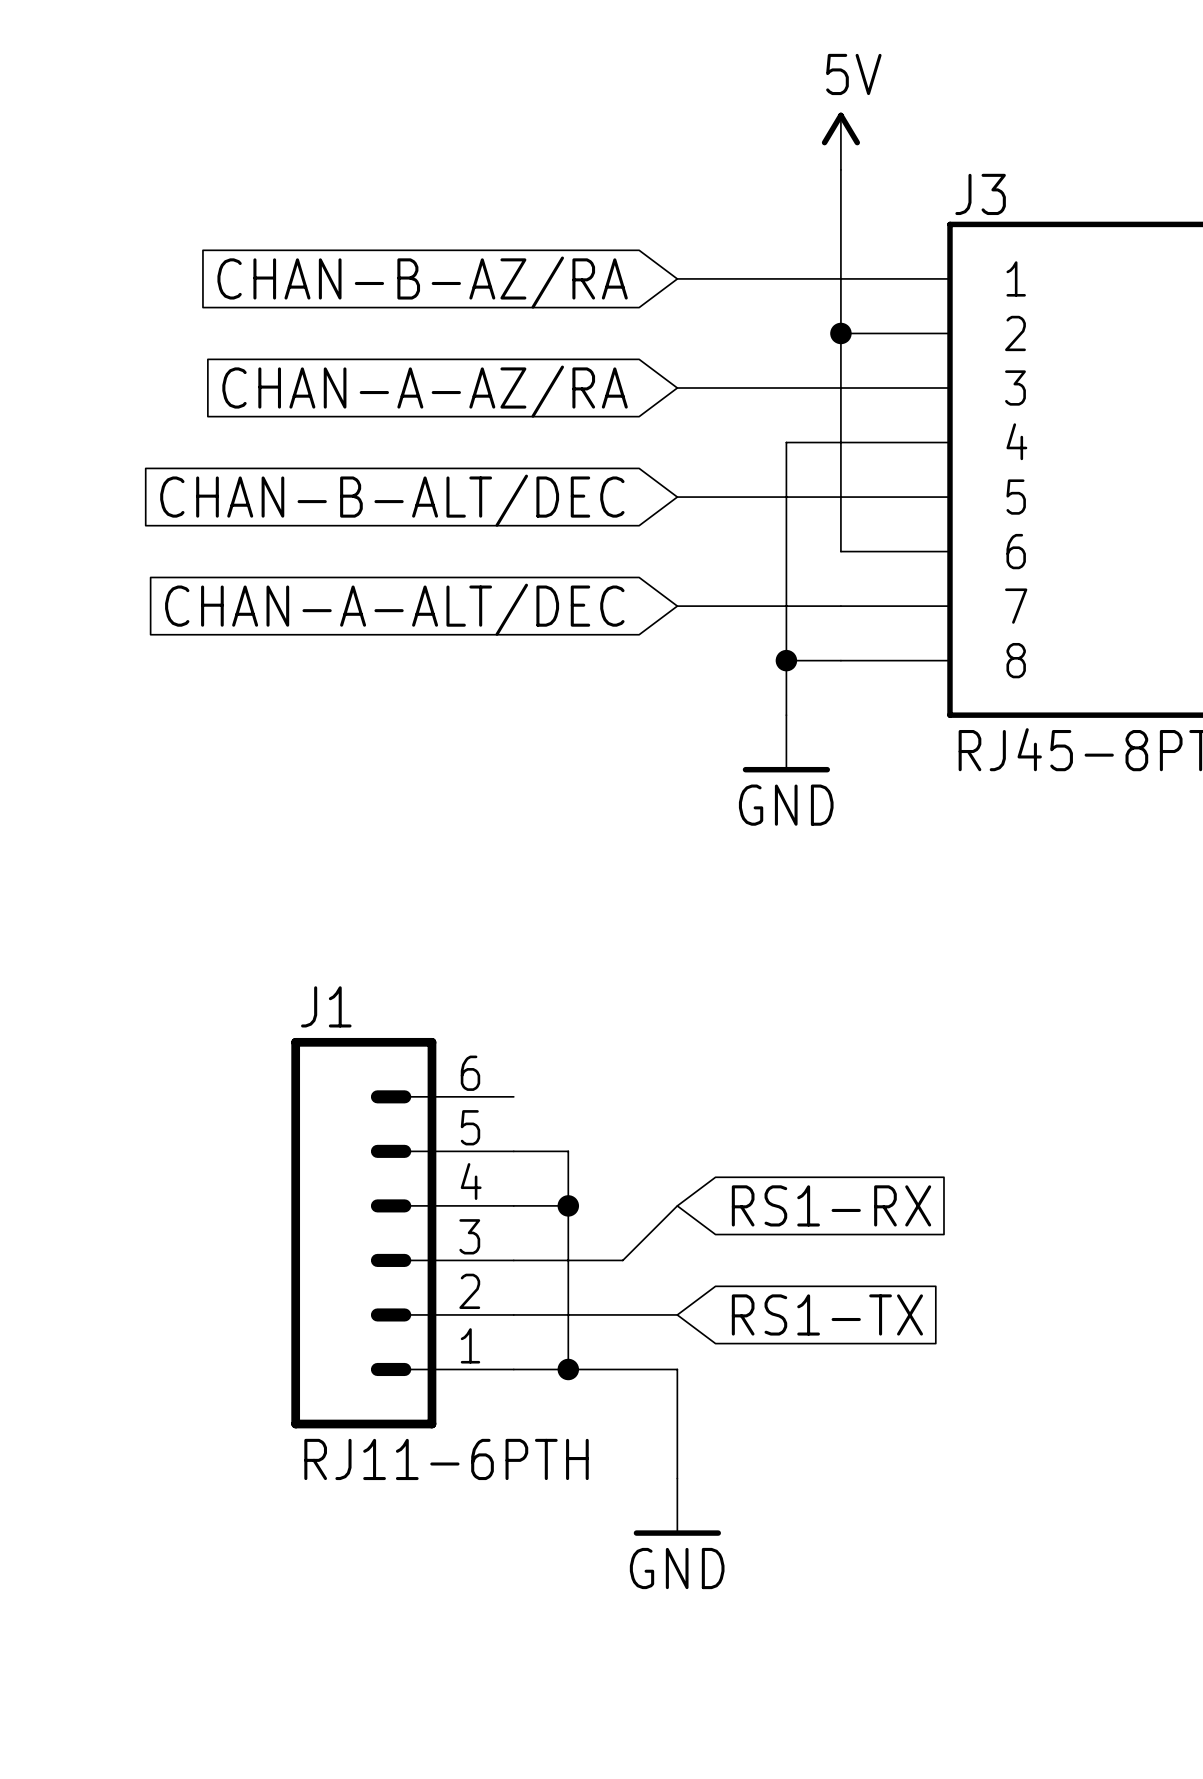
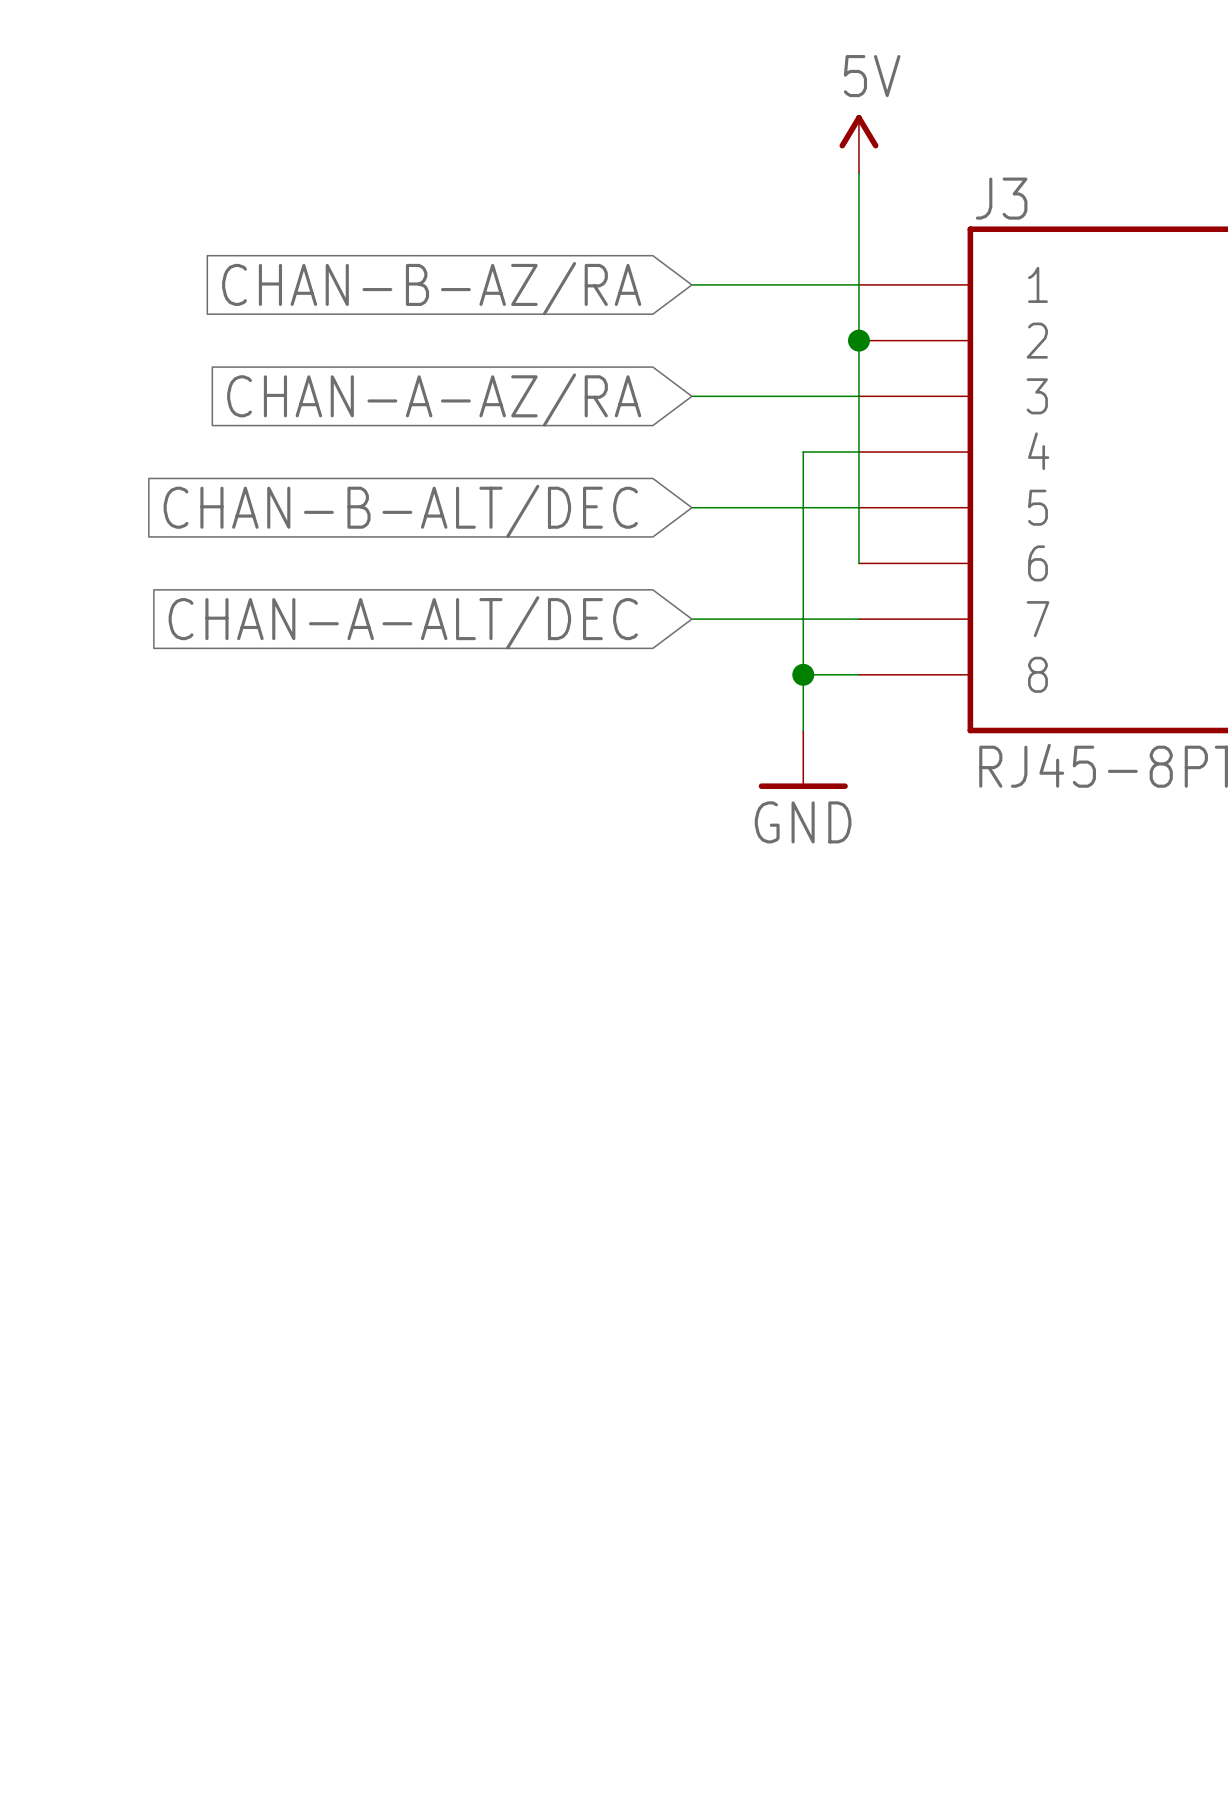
wire: (513, 1151) (568, 1151) (568, 1369) -> none
wire: (513, 1205) (568, 1205) -> none
junction: (568, 1205) -> none
wire: (677, 1205) (622, 1260) (513, 1260) -> none
global label: RS1-RX (831, 1205) -> none
J1: RJ11-6PTH (402, 1233) -> none
wire: (513, 1314) (677, 1314) -> none
global label: RS1-TX (827, 1314) -> none
wire: (513, 1369) (677, 1369) (677, 1478) -> none
junction: (568, 1369) -> none
power symbol: GND (677, 1507) -> none

